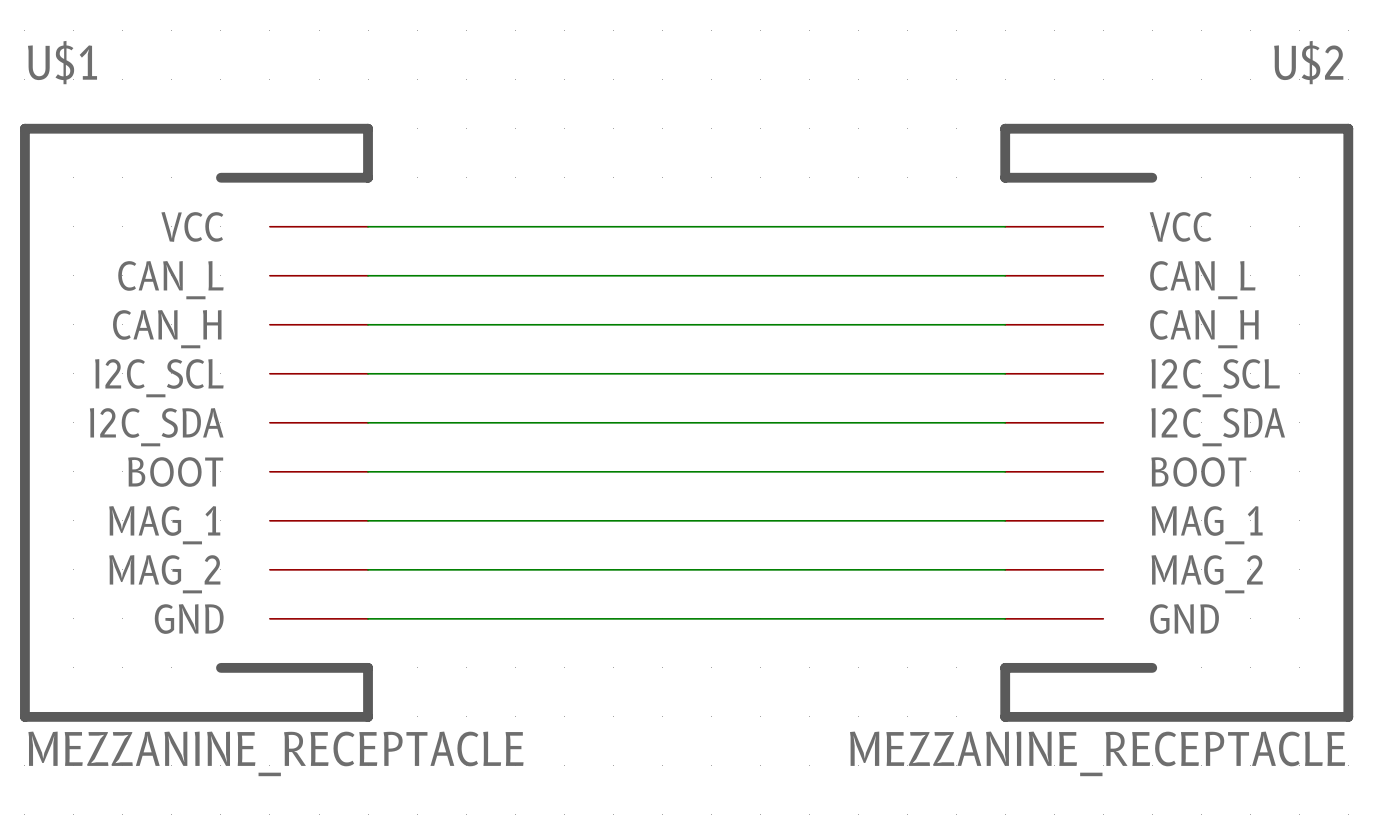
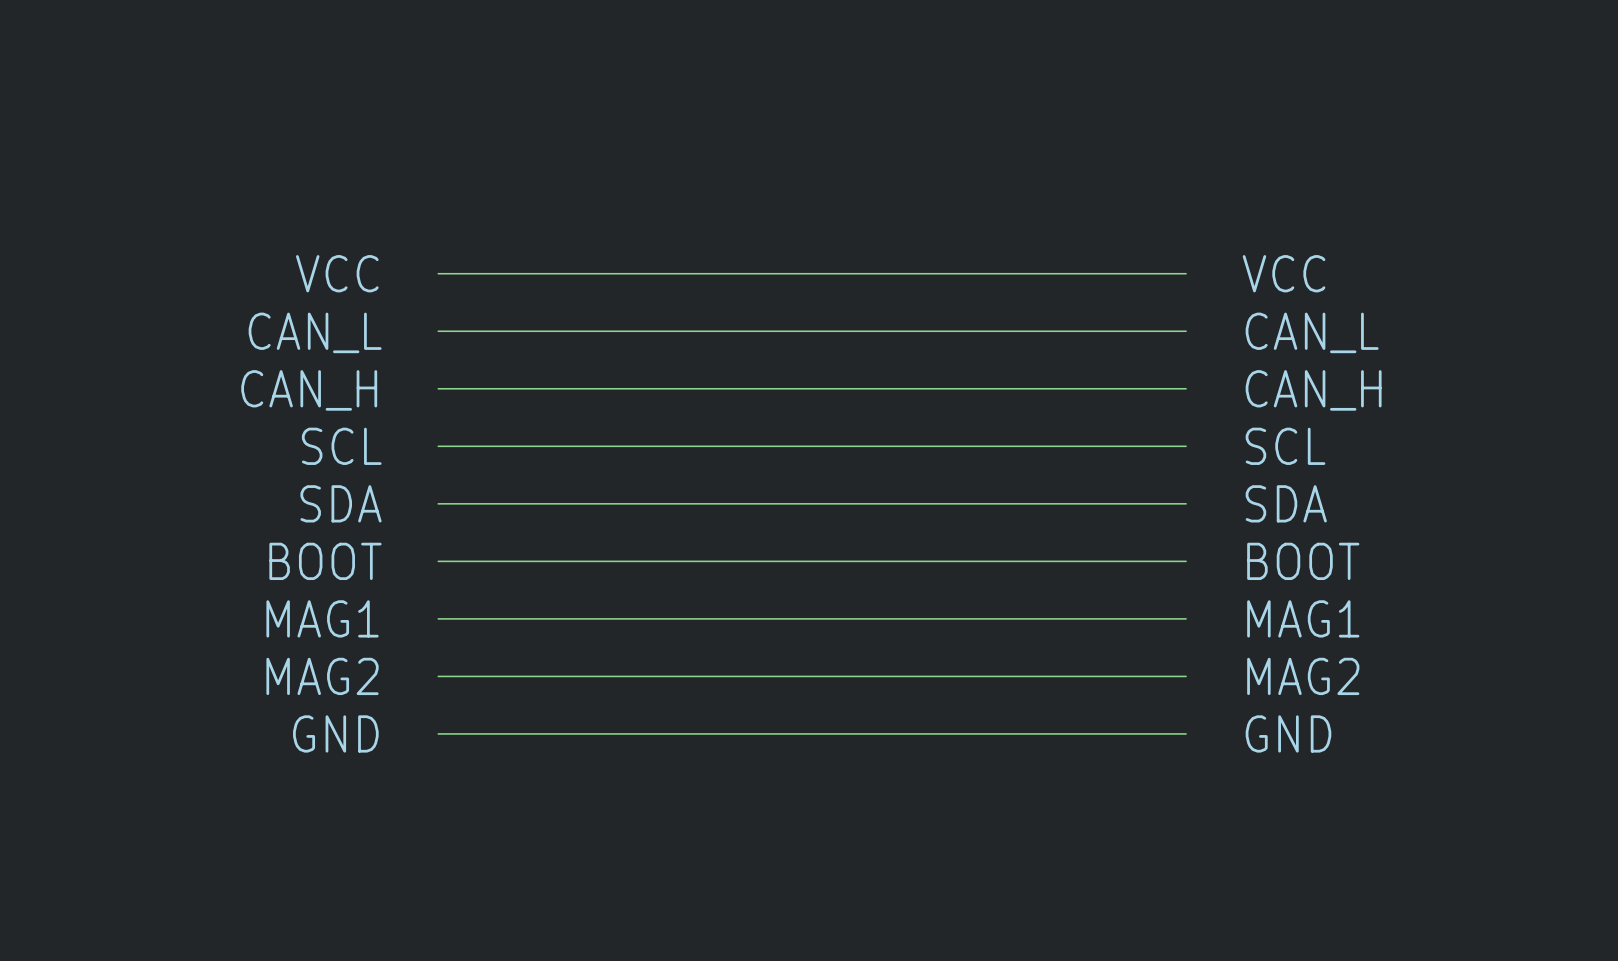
U$1: MEZZANINE_RECEPTACLE (196, 422) -> none
part: none -> (311, 503)
part: none -> (1312, 503)
U$2: MEZZANINE_RECEPTACLE (1176, 422) -> none

